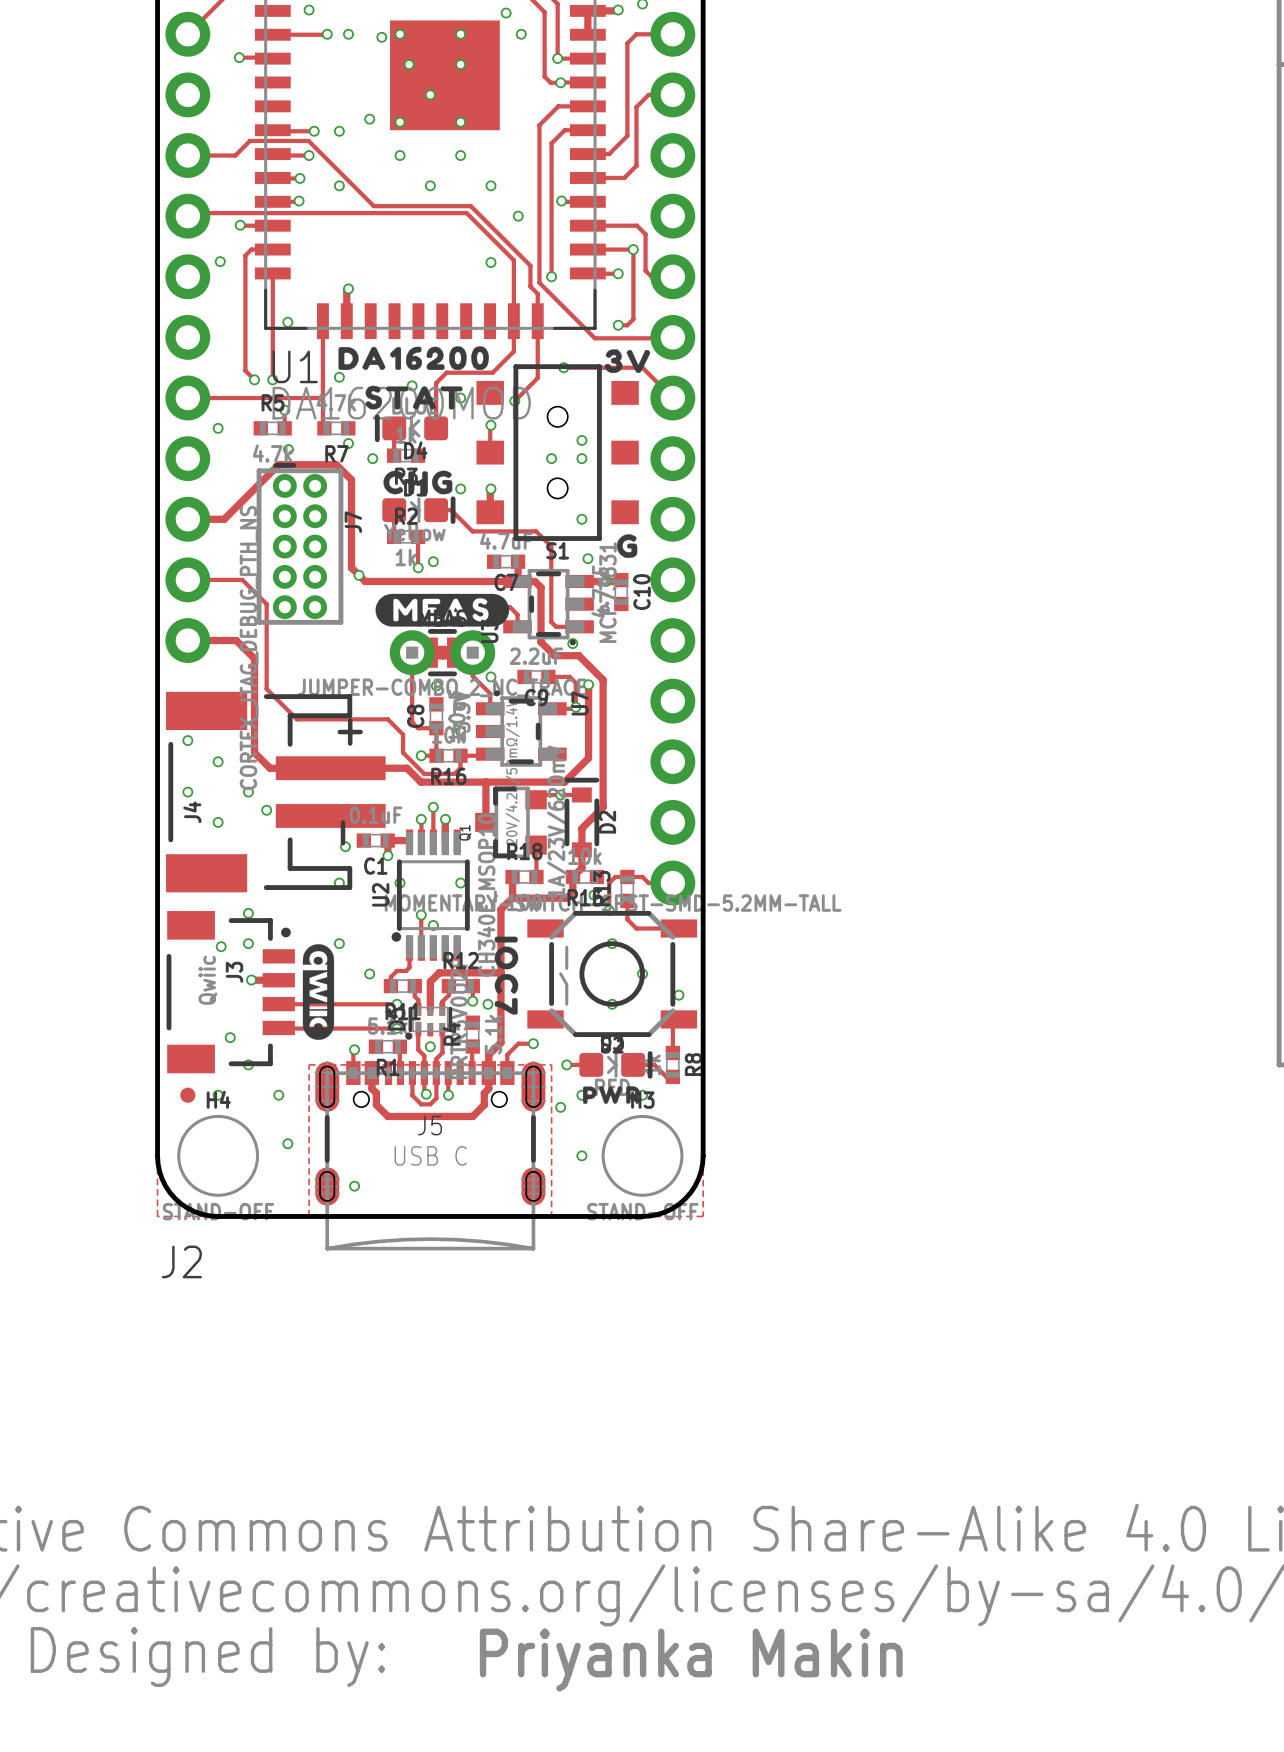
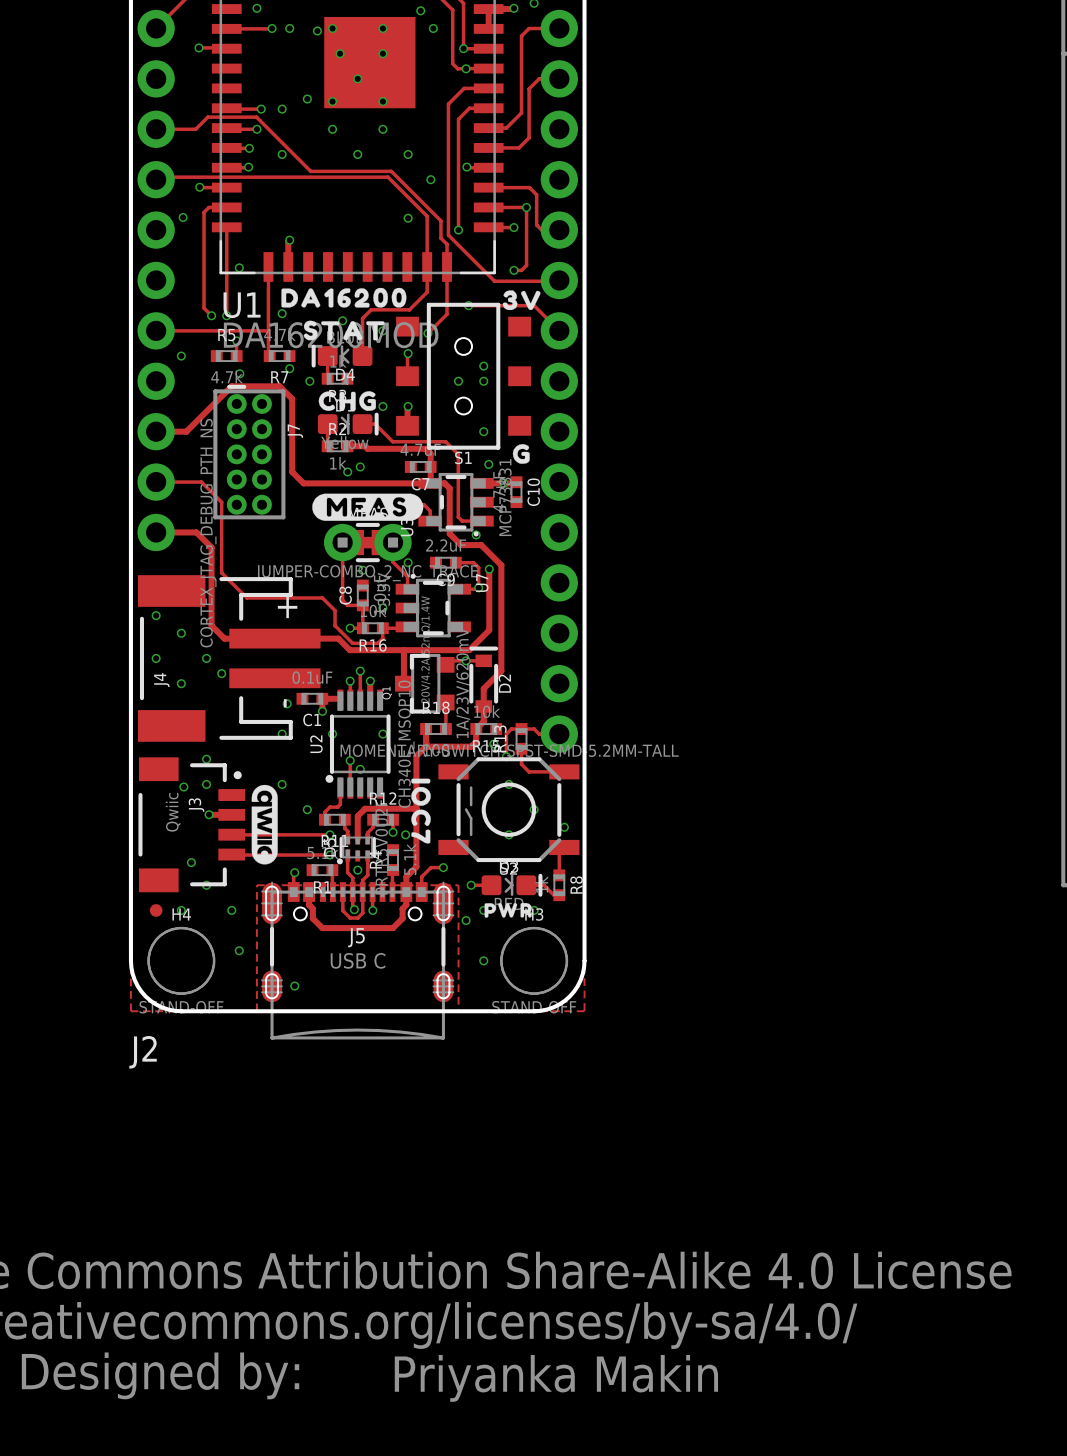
track: (418, 536) (418, 567) -> (347, 446) (365, 446) (367, 448) (425, 448) (430, 453) (430, 466)
via: (359, 575) -> none

